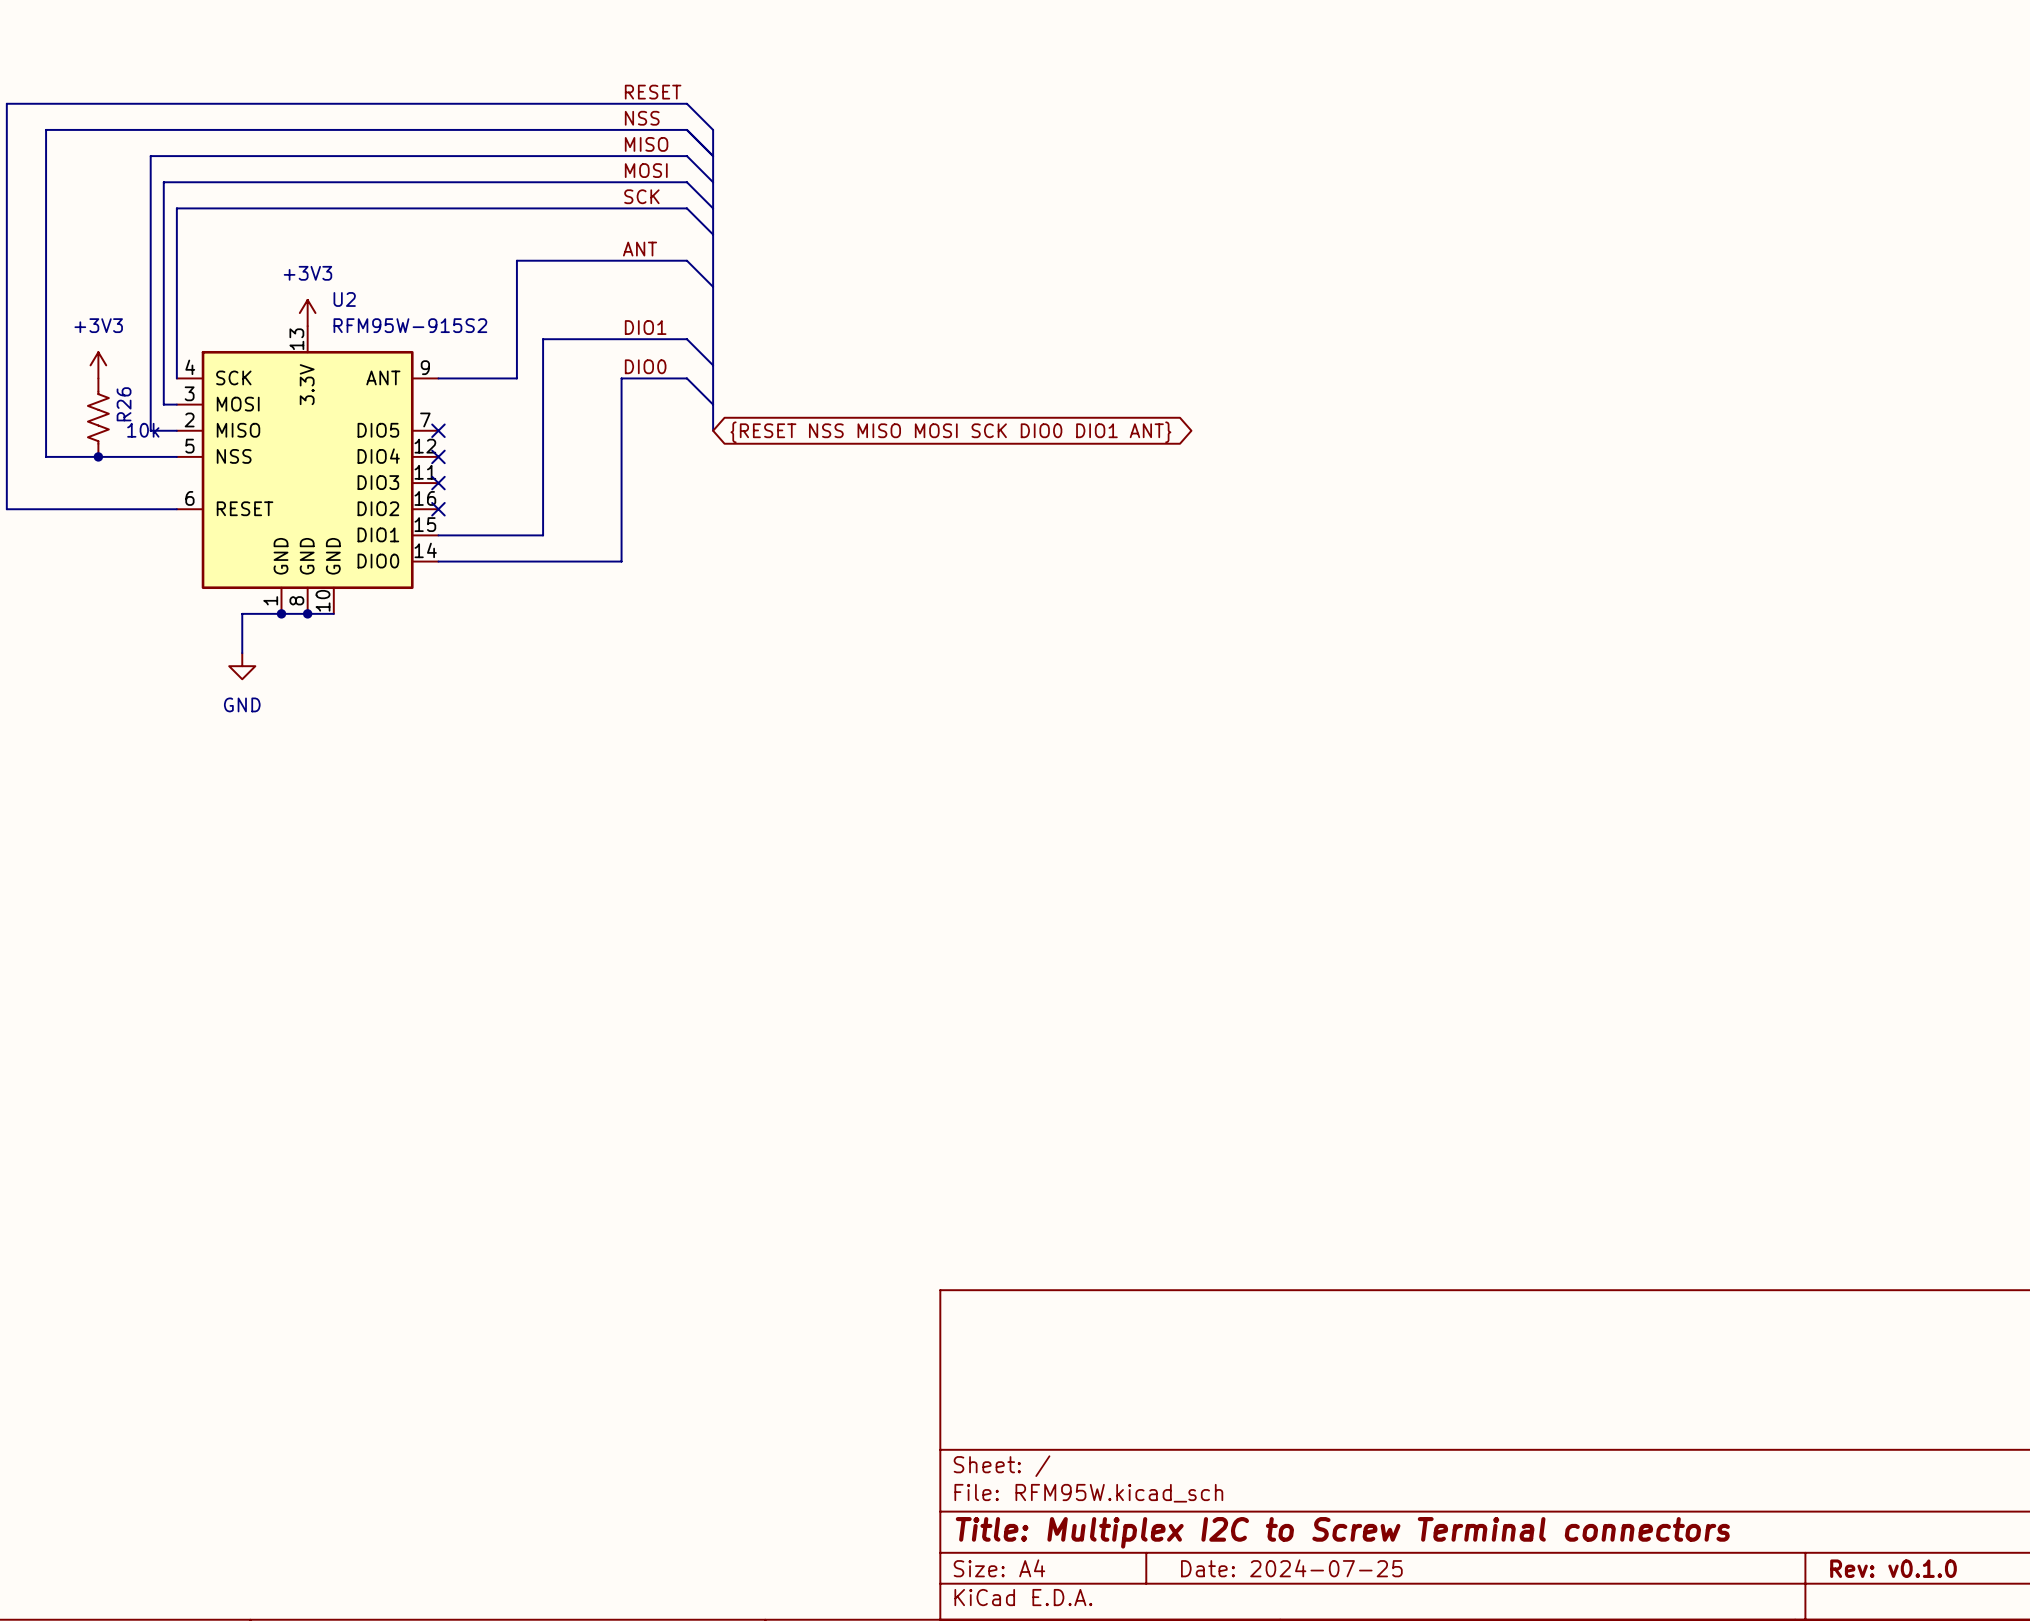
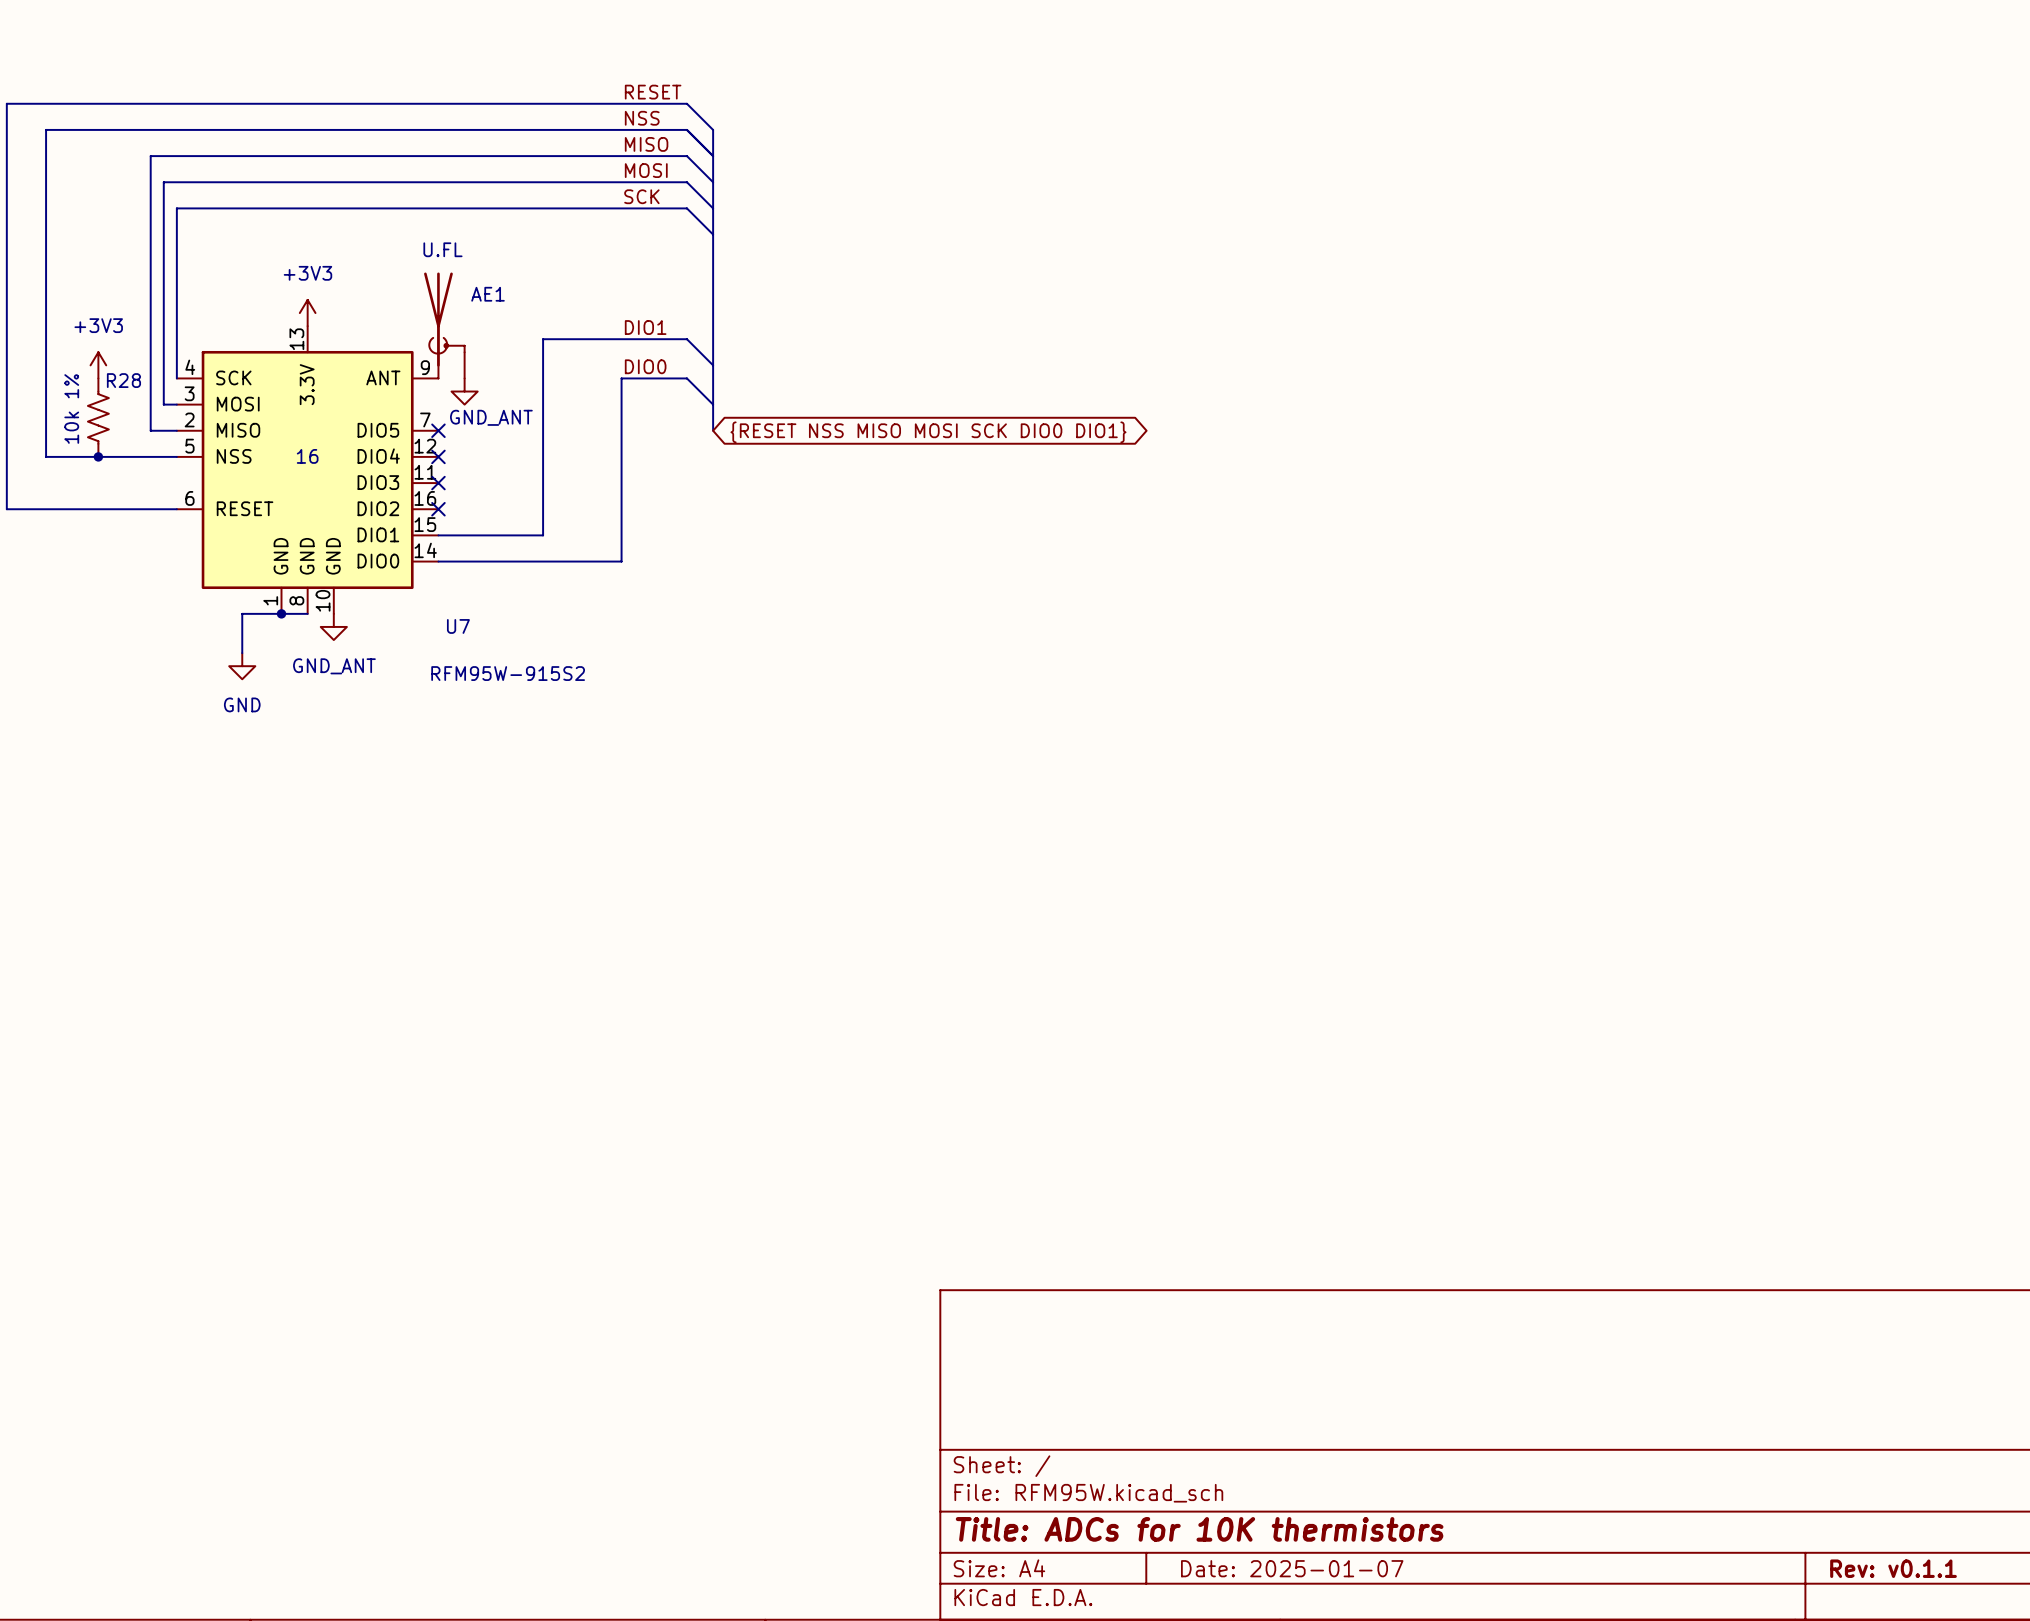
label: ANT (640, 249) -> none
wire: (713, 286) (686, 260) (516, 260) (516, 378) (438, 378) -> none
U2 name: U2 (344, 299) -> U7 (458, 626)
U2 value position: RFM95W-915S2 (410, 325) -> RFM95W-915S2 (508, 673)
AE1: none -> U.FL (444, 325)
power symbol: none -> GND_ANT (464, 391)
R26 name: R26 (124, 404) -> R28 (123, 380)
R26 value: 10k (143, 430) -> 10k 1% (71, 408)
global label: {RESET NSS MISO MOSI SCK DIO0 DIO1 ANT} (950, 432) -> {RESET NSS MISO MOSI SCK DIO0 DIO1} (928, 432)
U2 text: none -> 16 (307, 456)
wire: (307, 613) (333, 613) -> none
junction: (307, 613) -> none
power symbol: none -> GND_ANT (333, 626)
title block: Title: Multiplex I2C to Screw Terminal connectors (1342, 1532) -> Title: ADCs for 10K thermistors (1199, 1529)
title block: Date: 2024-07-25 (1291, 1568) -> Date: 2025-01-07 (1292, 1568)
title block: Rev: v0.1.0 (1893, 1568) -> Rev: v0.1.1 (1893, 1568)

